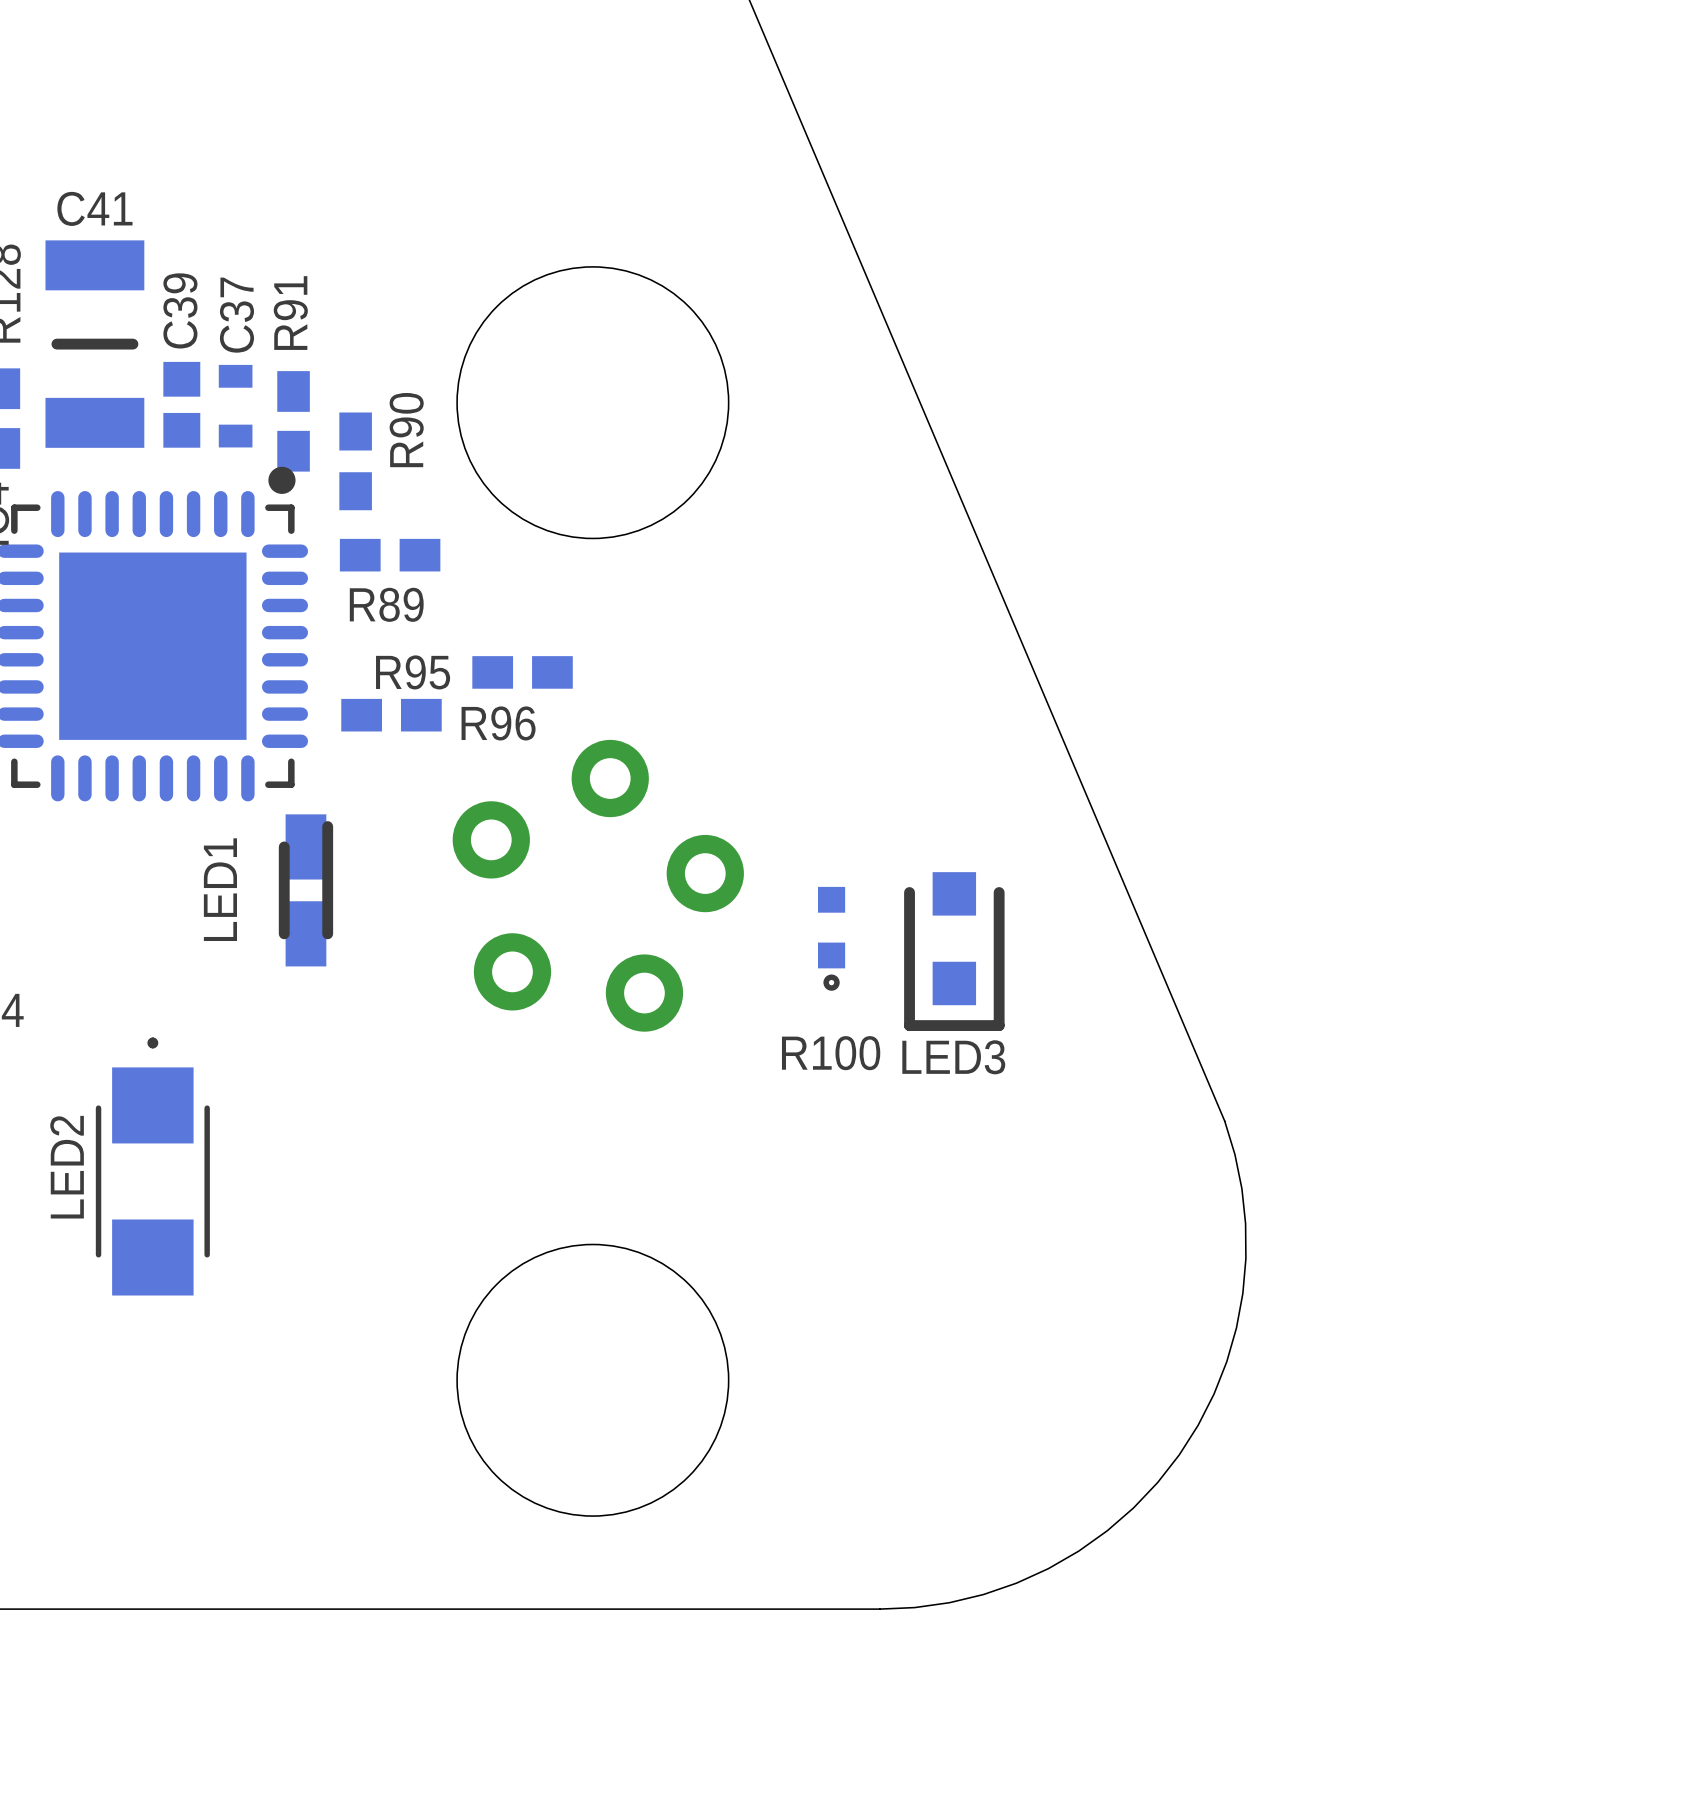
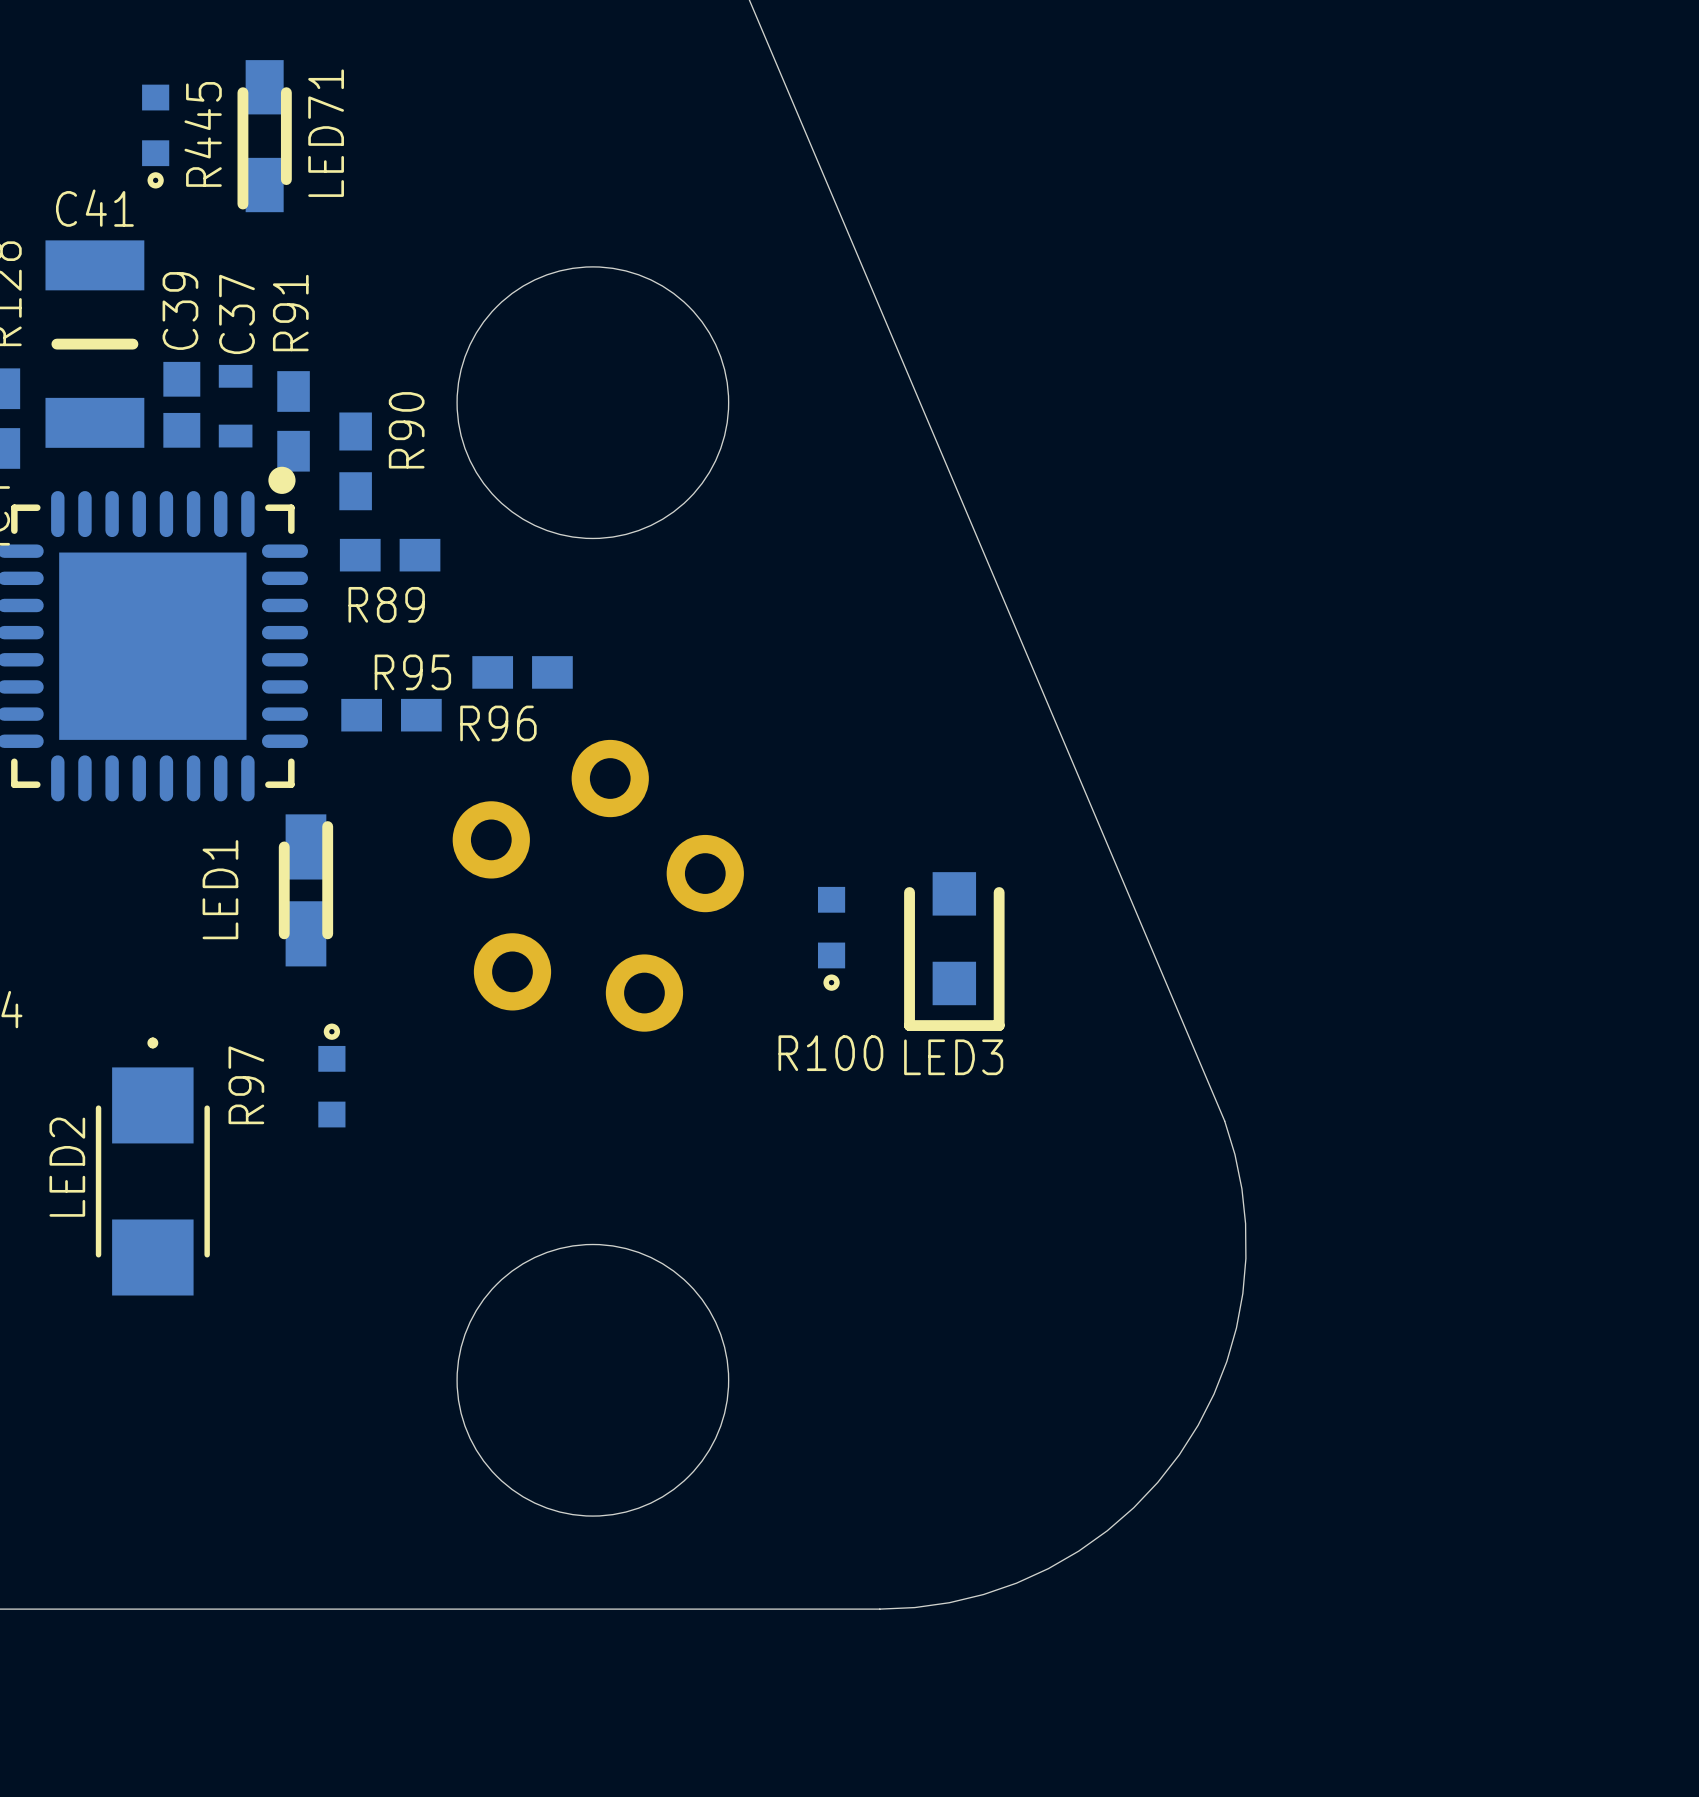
R445: none -> (155, 136)
LED71: none -> (264, 136)
R97: none -> (331, 1075)

